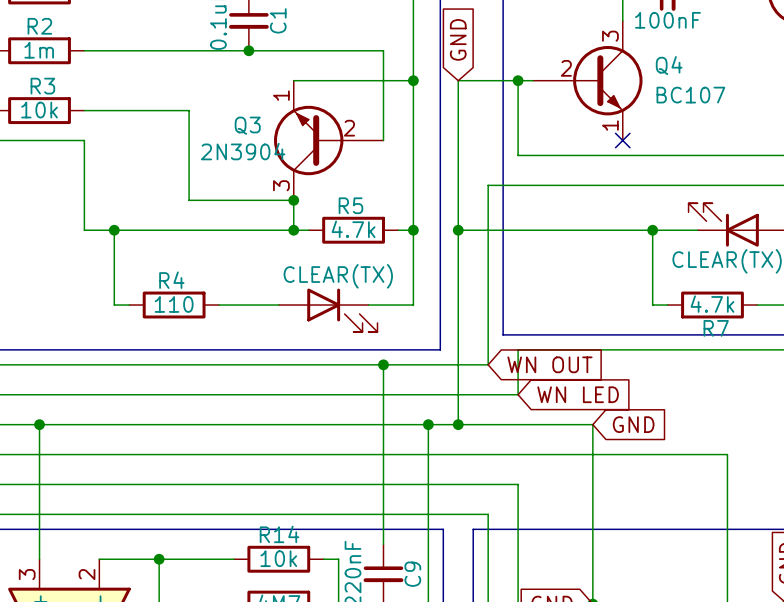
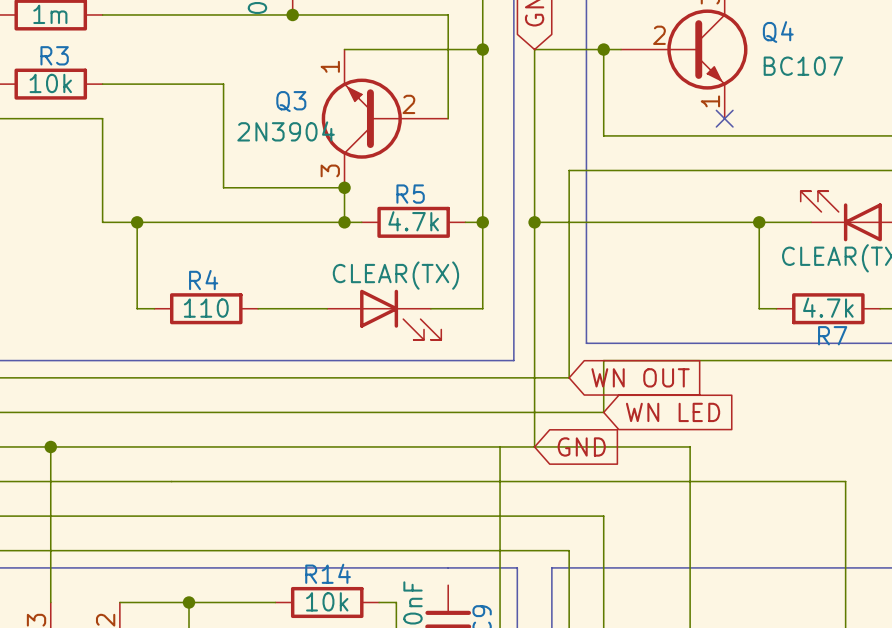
wire: (383, 364) (383, 544) -> none
junction: (383, 364) -> none
junction: (428, 424) -> none
junction: (458, 424) -> none
global label position: GND (633, 424) -> GND (581, 446)

